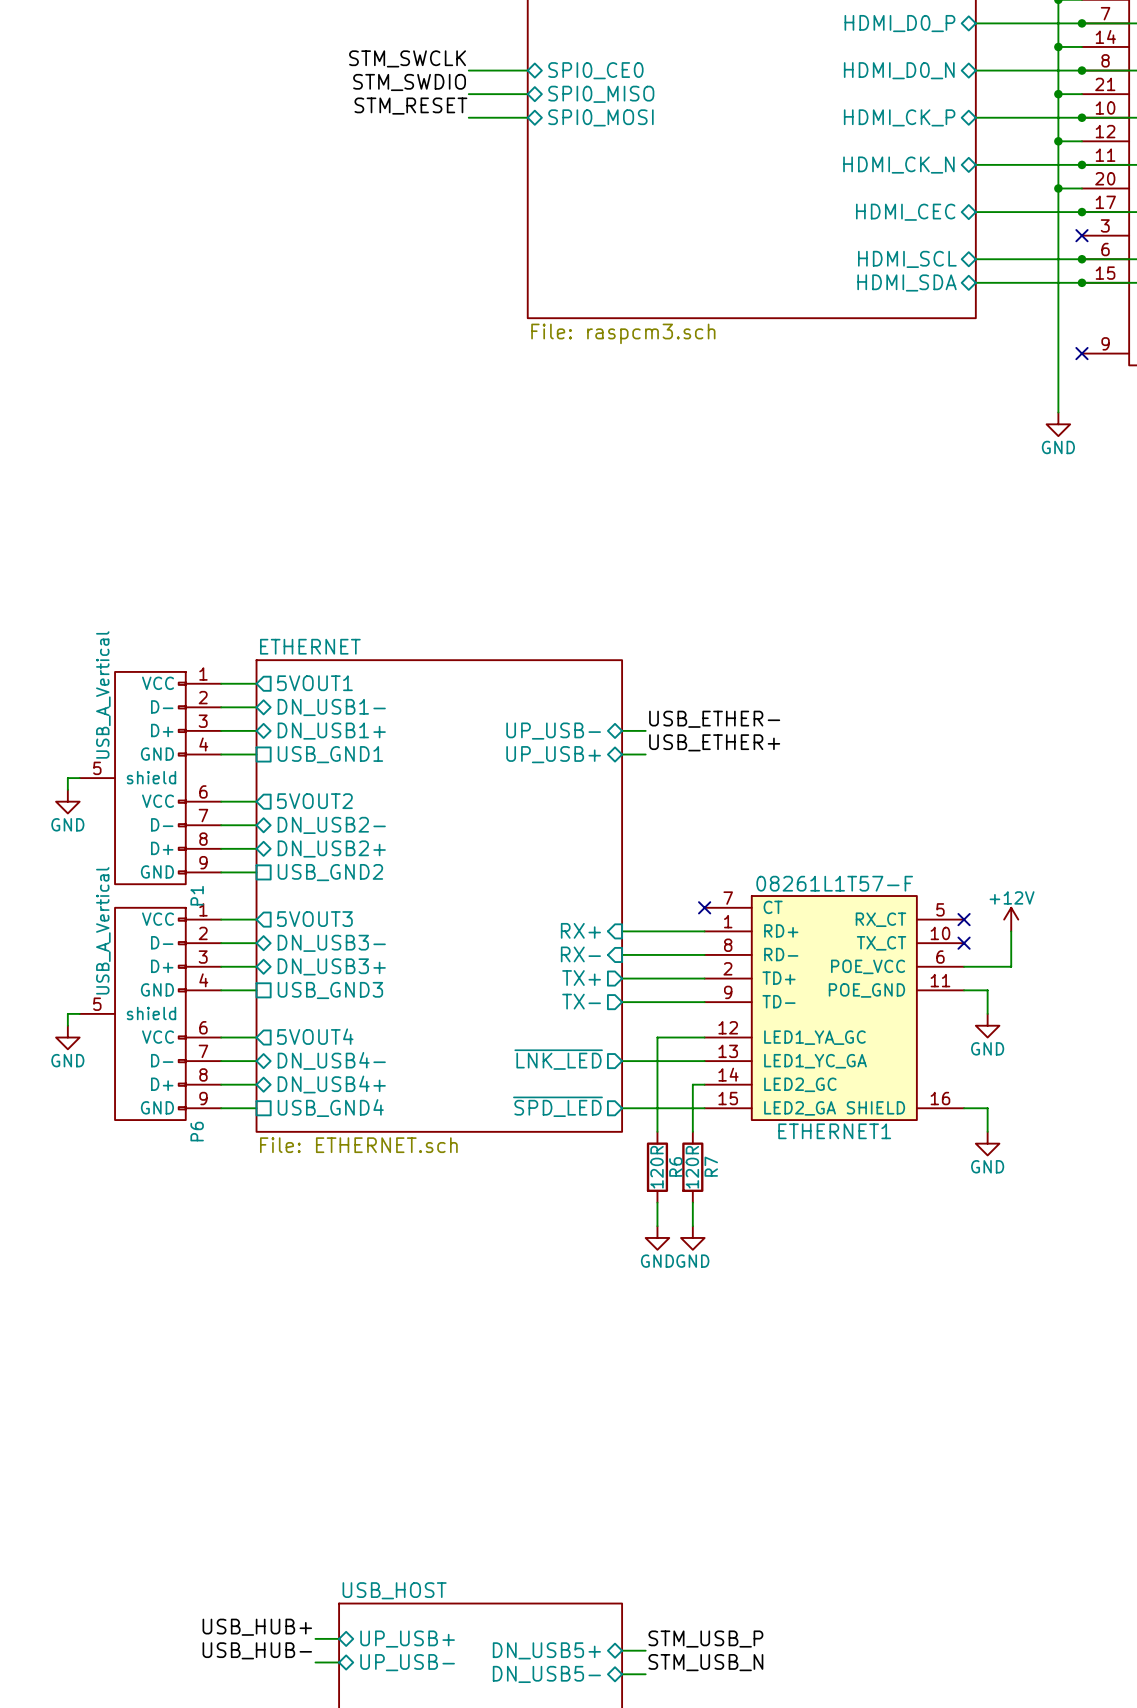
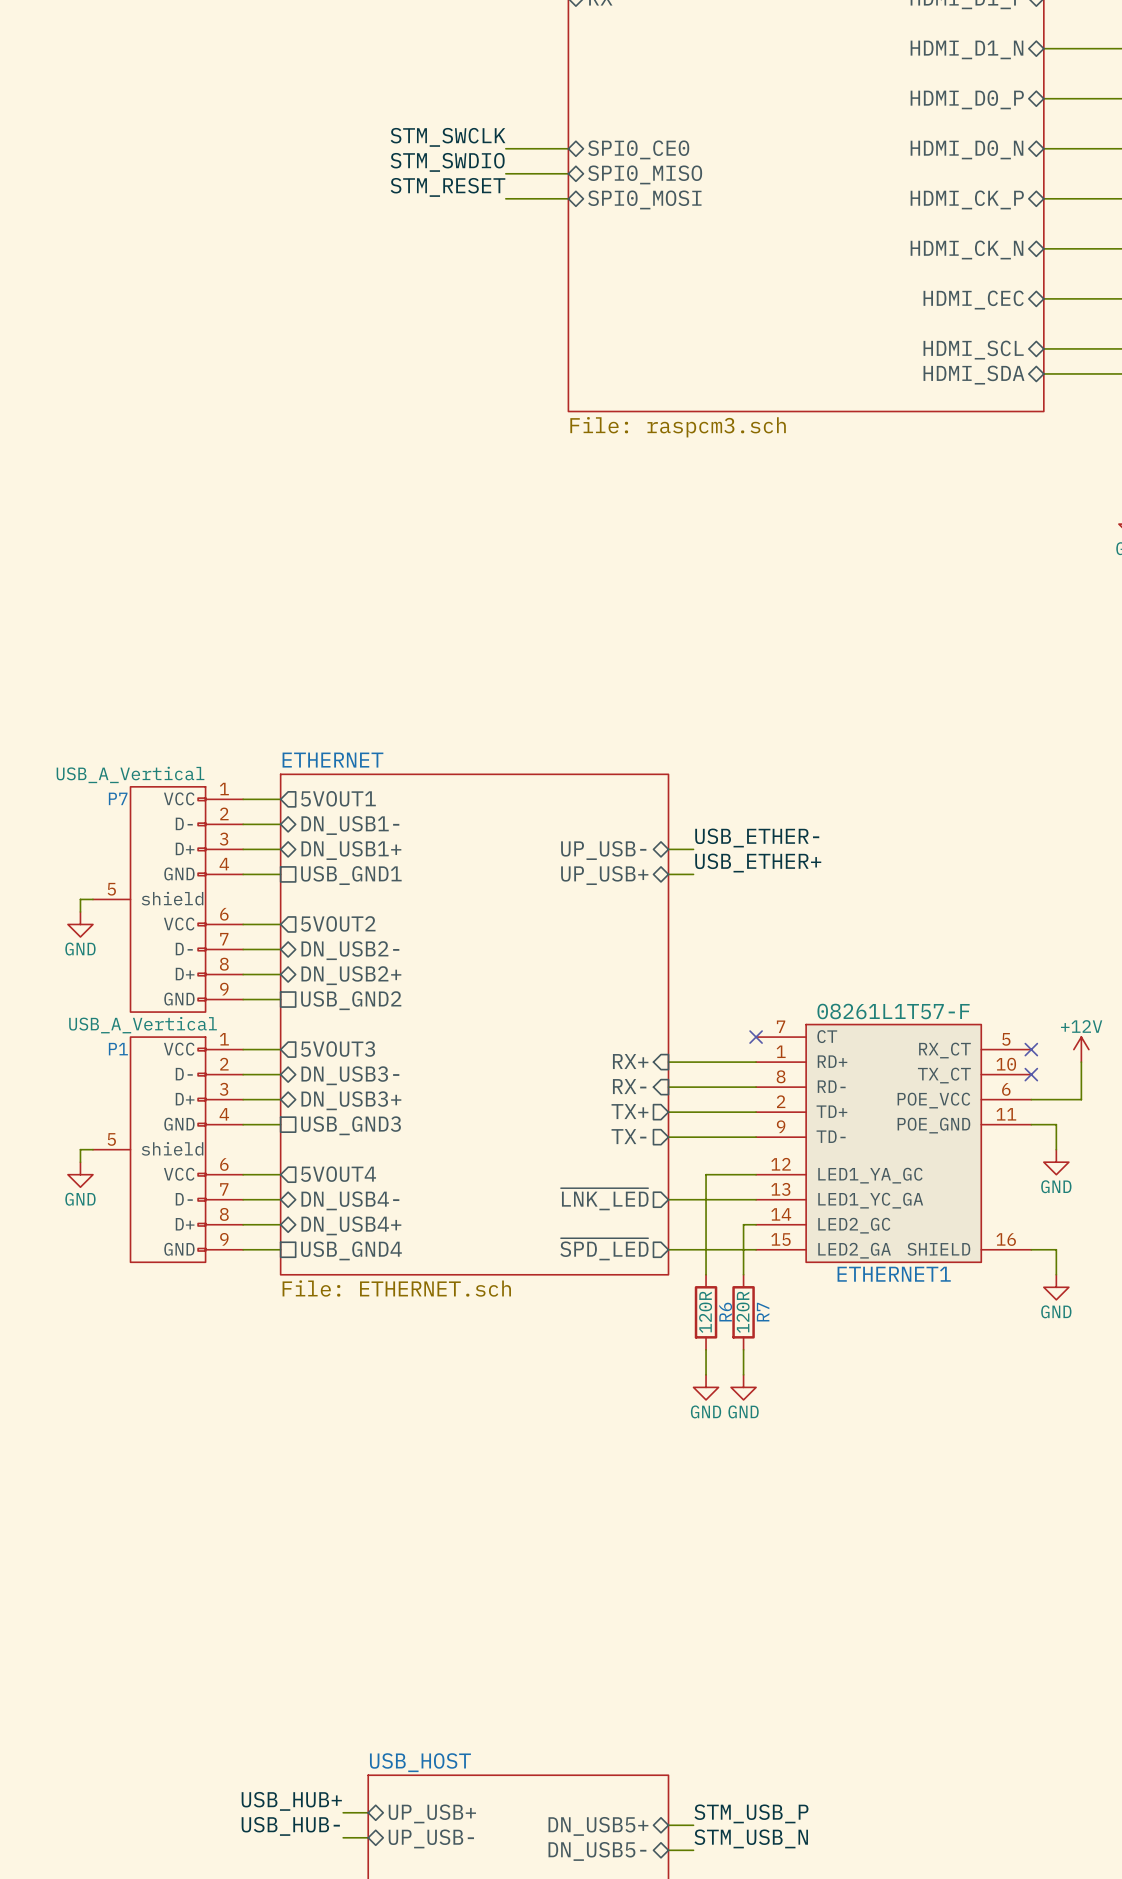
P1 value rotation: 0° (103, 694) -> 90° clockwise (130, 774)
P1 name: P1 (197, 895) -> P7 (118, 798)
P6 value rotation: 0° (103, 930) -> 90° clockwise (143, 1025)
P6 name: P6 (197, 1131) -> P1 (118, 1049)

